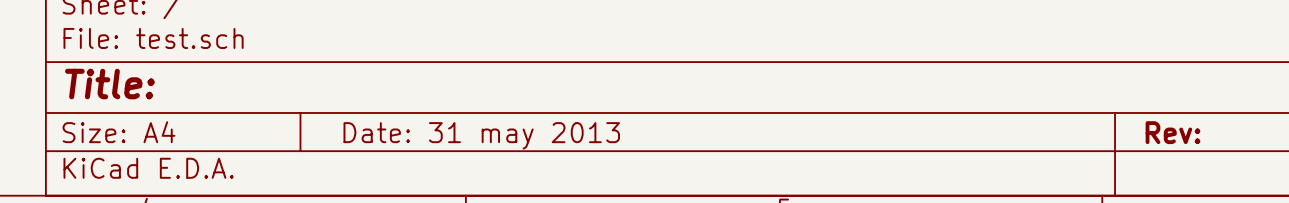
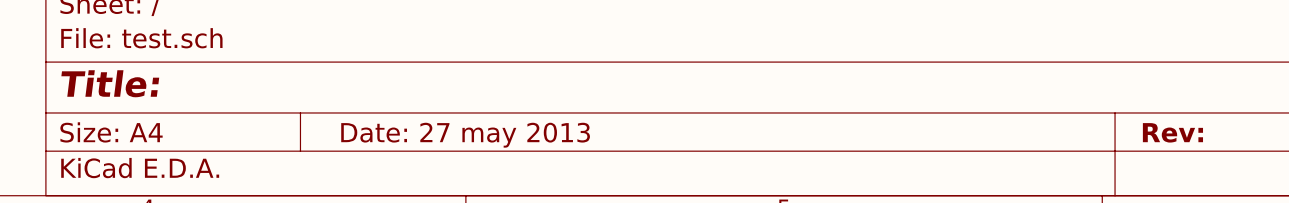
title block: Date: 31 may 2013 (481, 135) -> Date: 27 may 2013 (465, 135)

